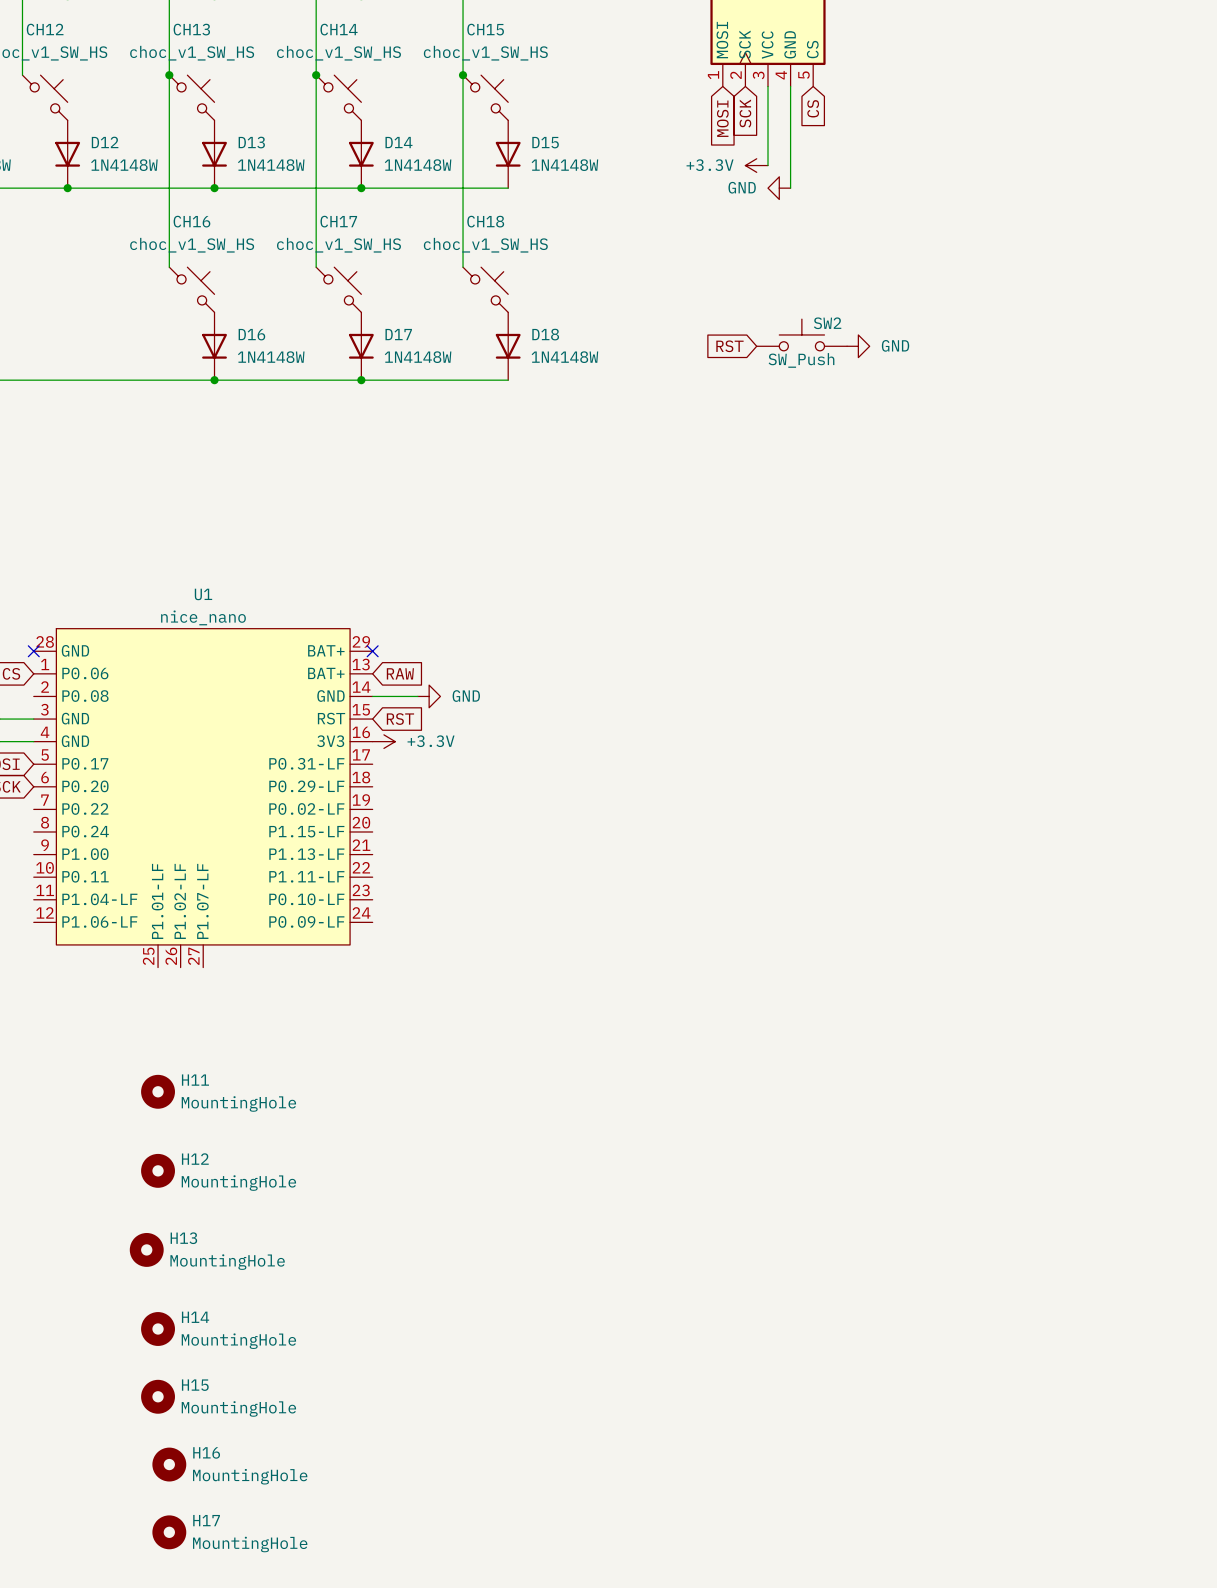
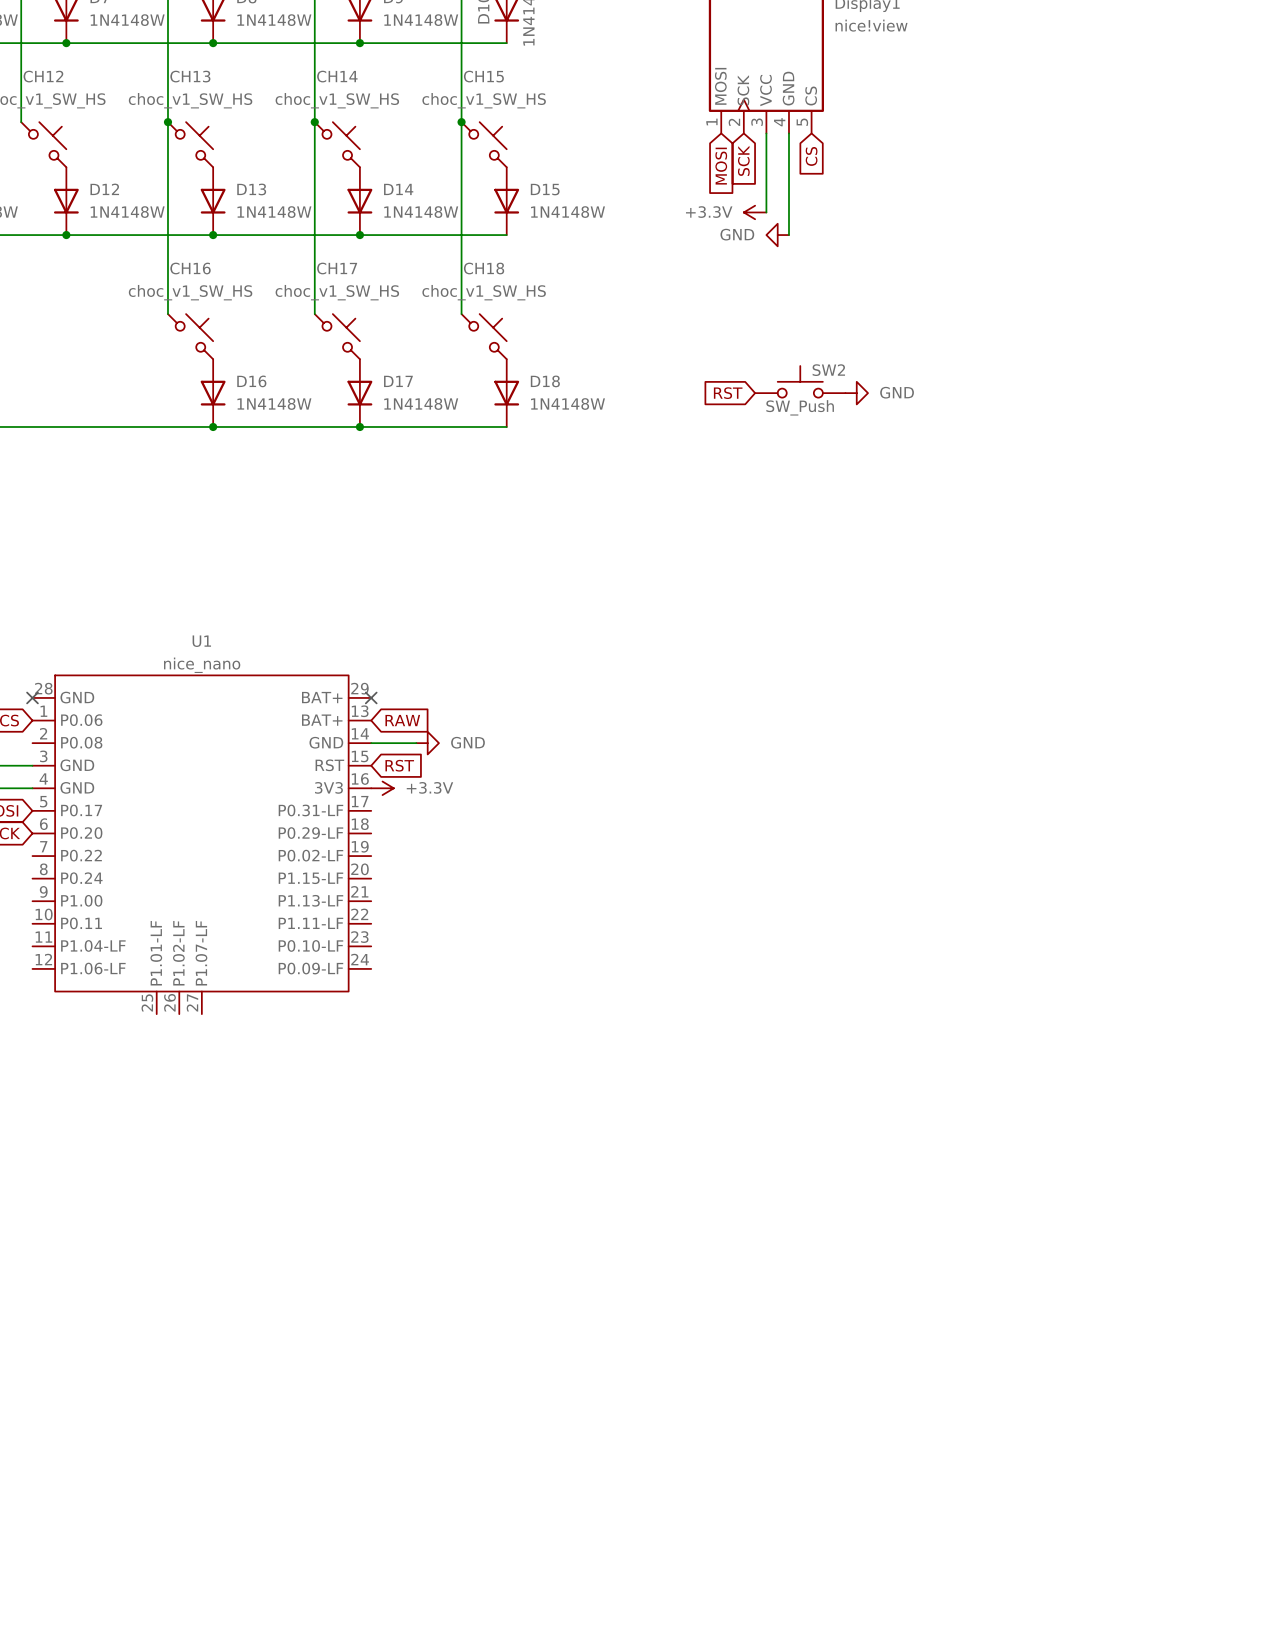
H11: MountingHole (158, 1091) -> none
H12: MountingHole (158, 1170) -> none
H13: MountingHole (146, 1249) -> none
H14: MountingHole (158, 1329) -> none
H15: MountingHole (158, 1396) -> none
H16: MountingHole (169, 1464) -> none
H17: MountingHole (169, 1532) -> none

